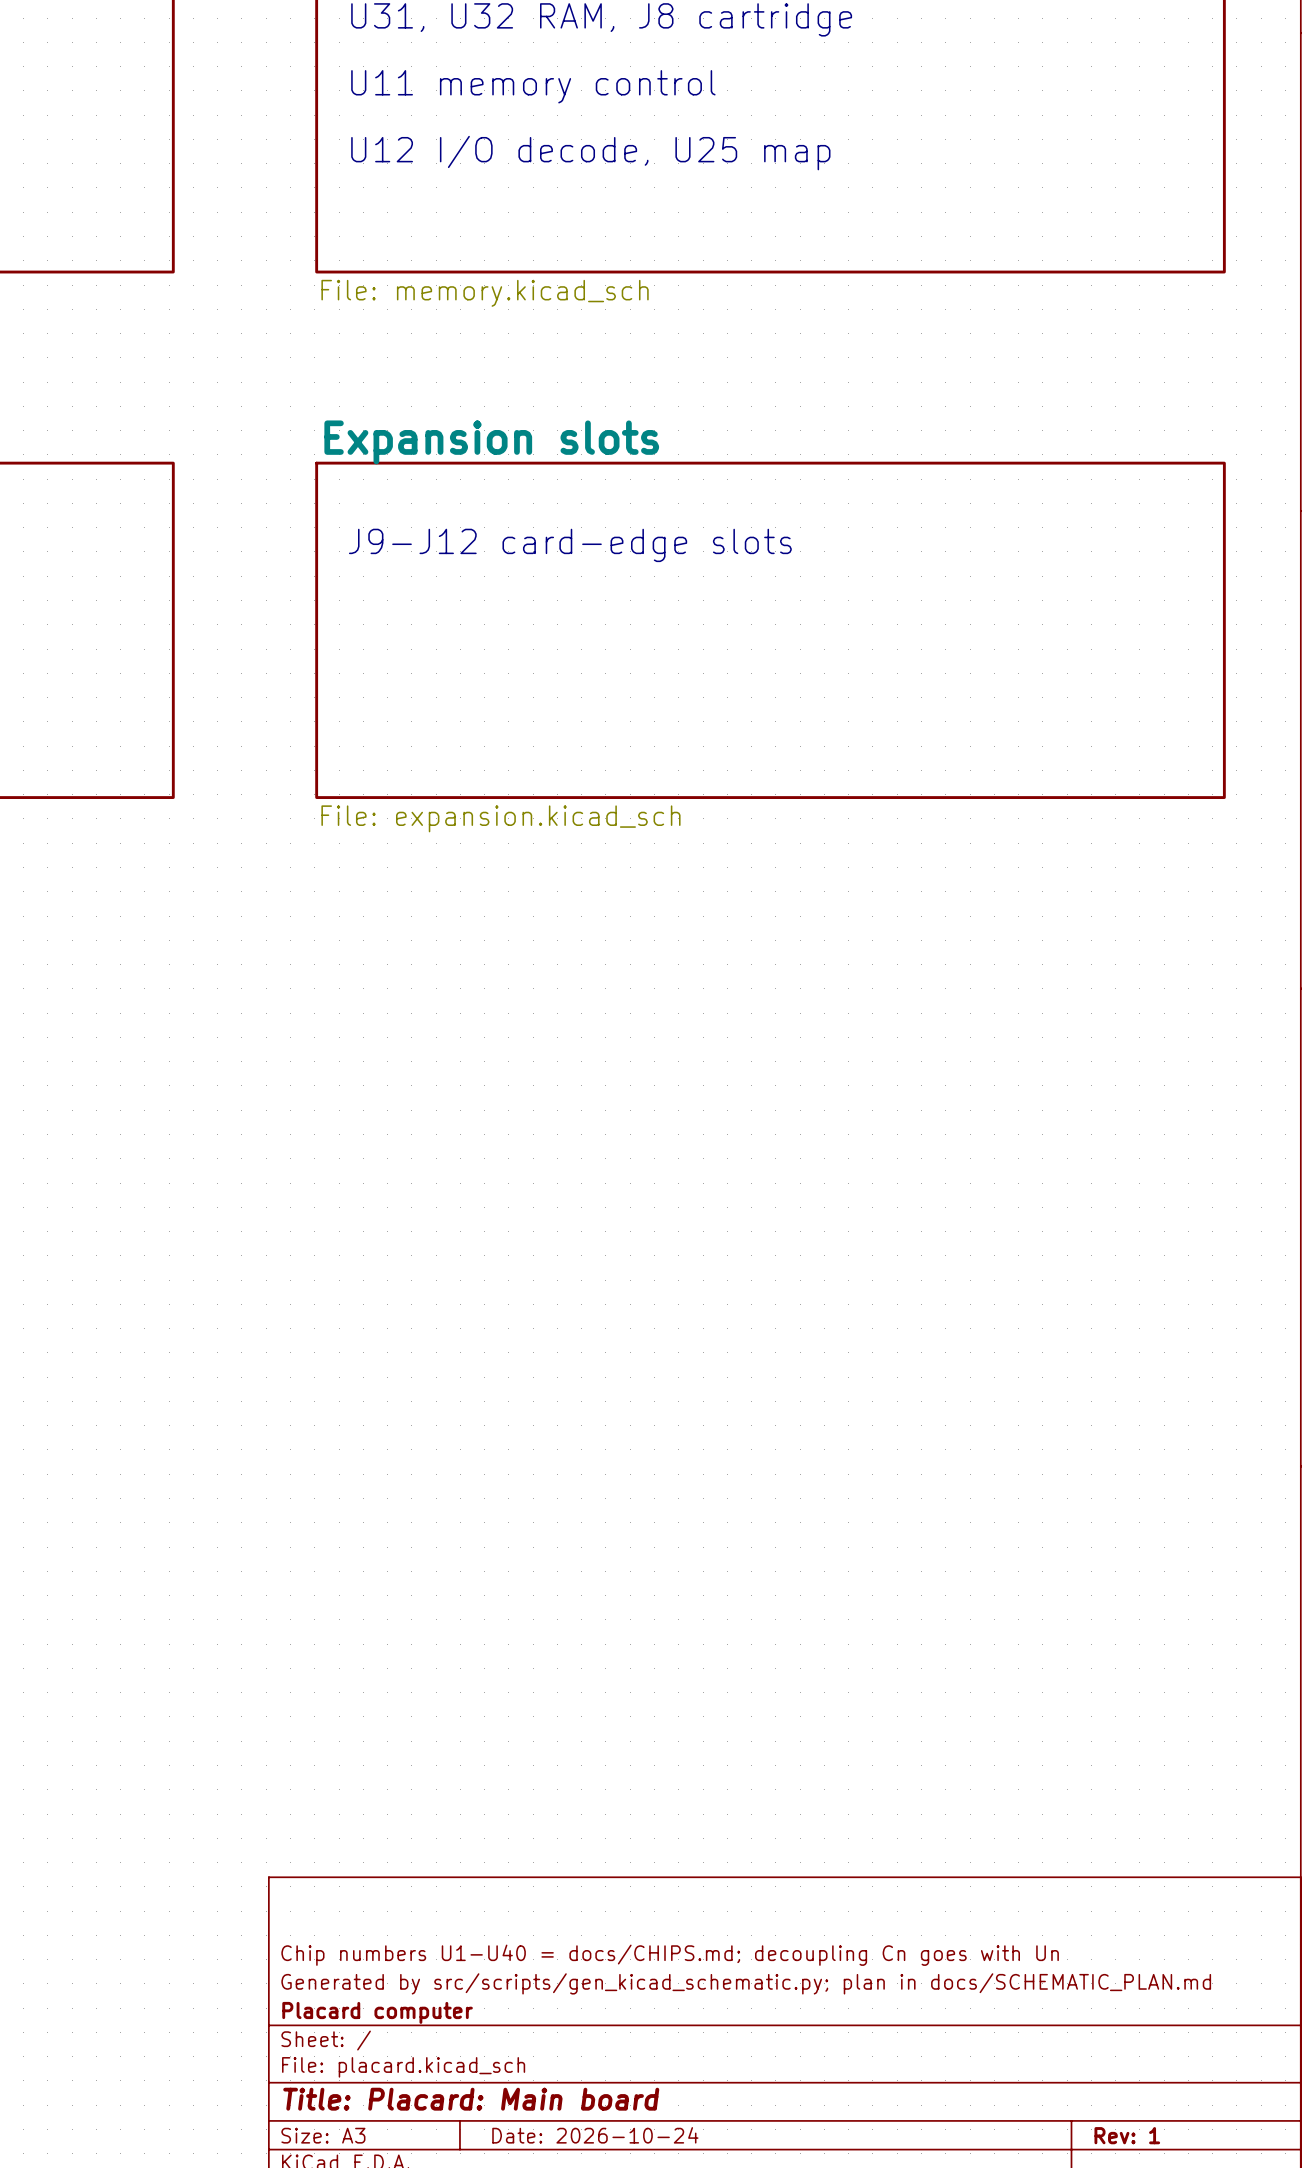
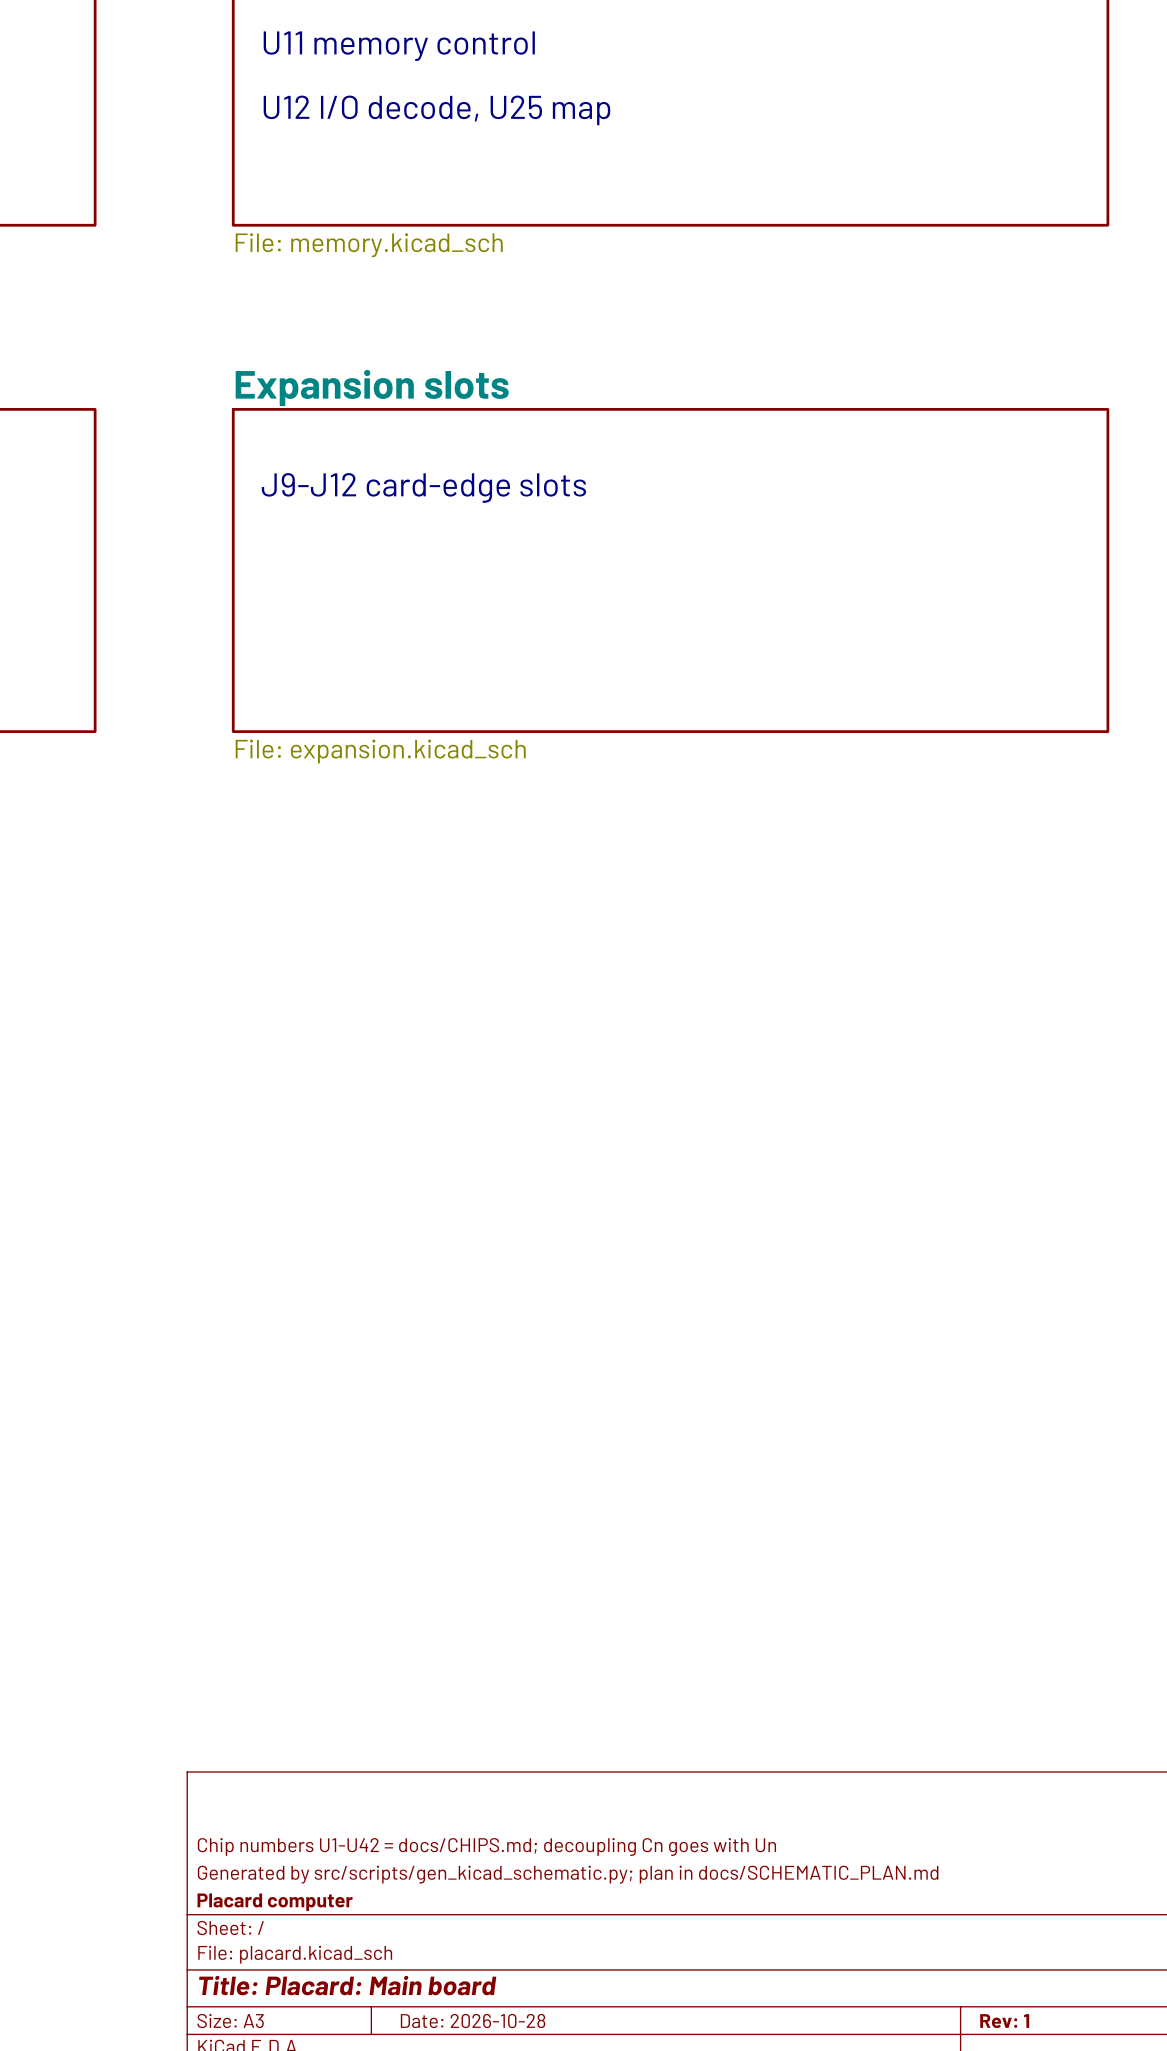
title block: Chip numbers U1-U40 = docs/CHIPS.md; decoupling Cn goes with Un (670, 1955) -> Chip numbers U1-U42 = docs/CHIPS.md; decoupling Cn goes with Un (486, 1847)
title block: Date: 2026-10-24 (595, 2135) -> Date: 2026-10-28 (473, 2021)

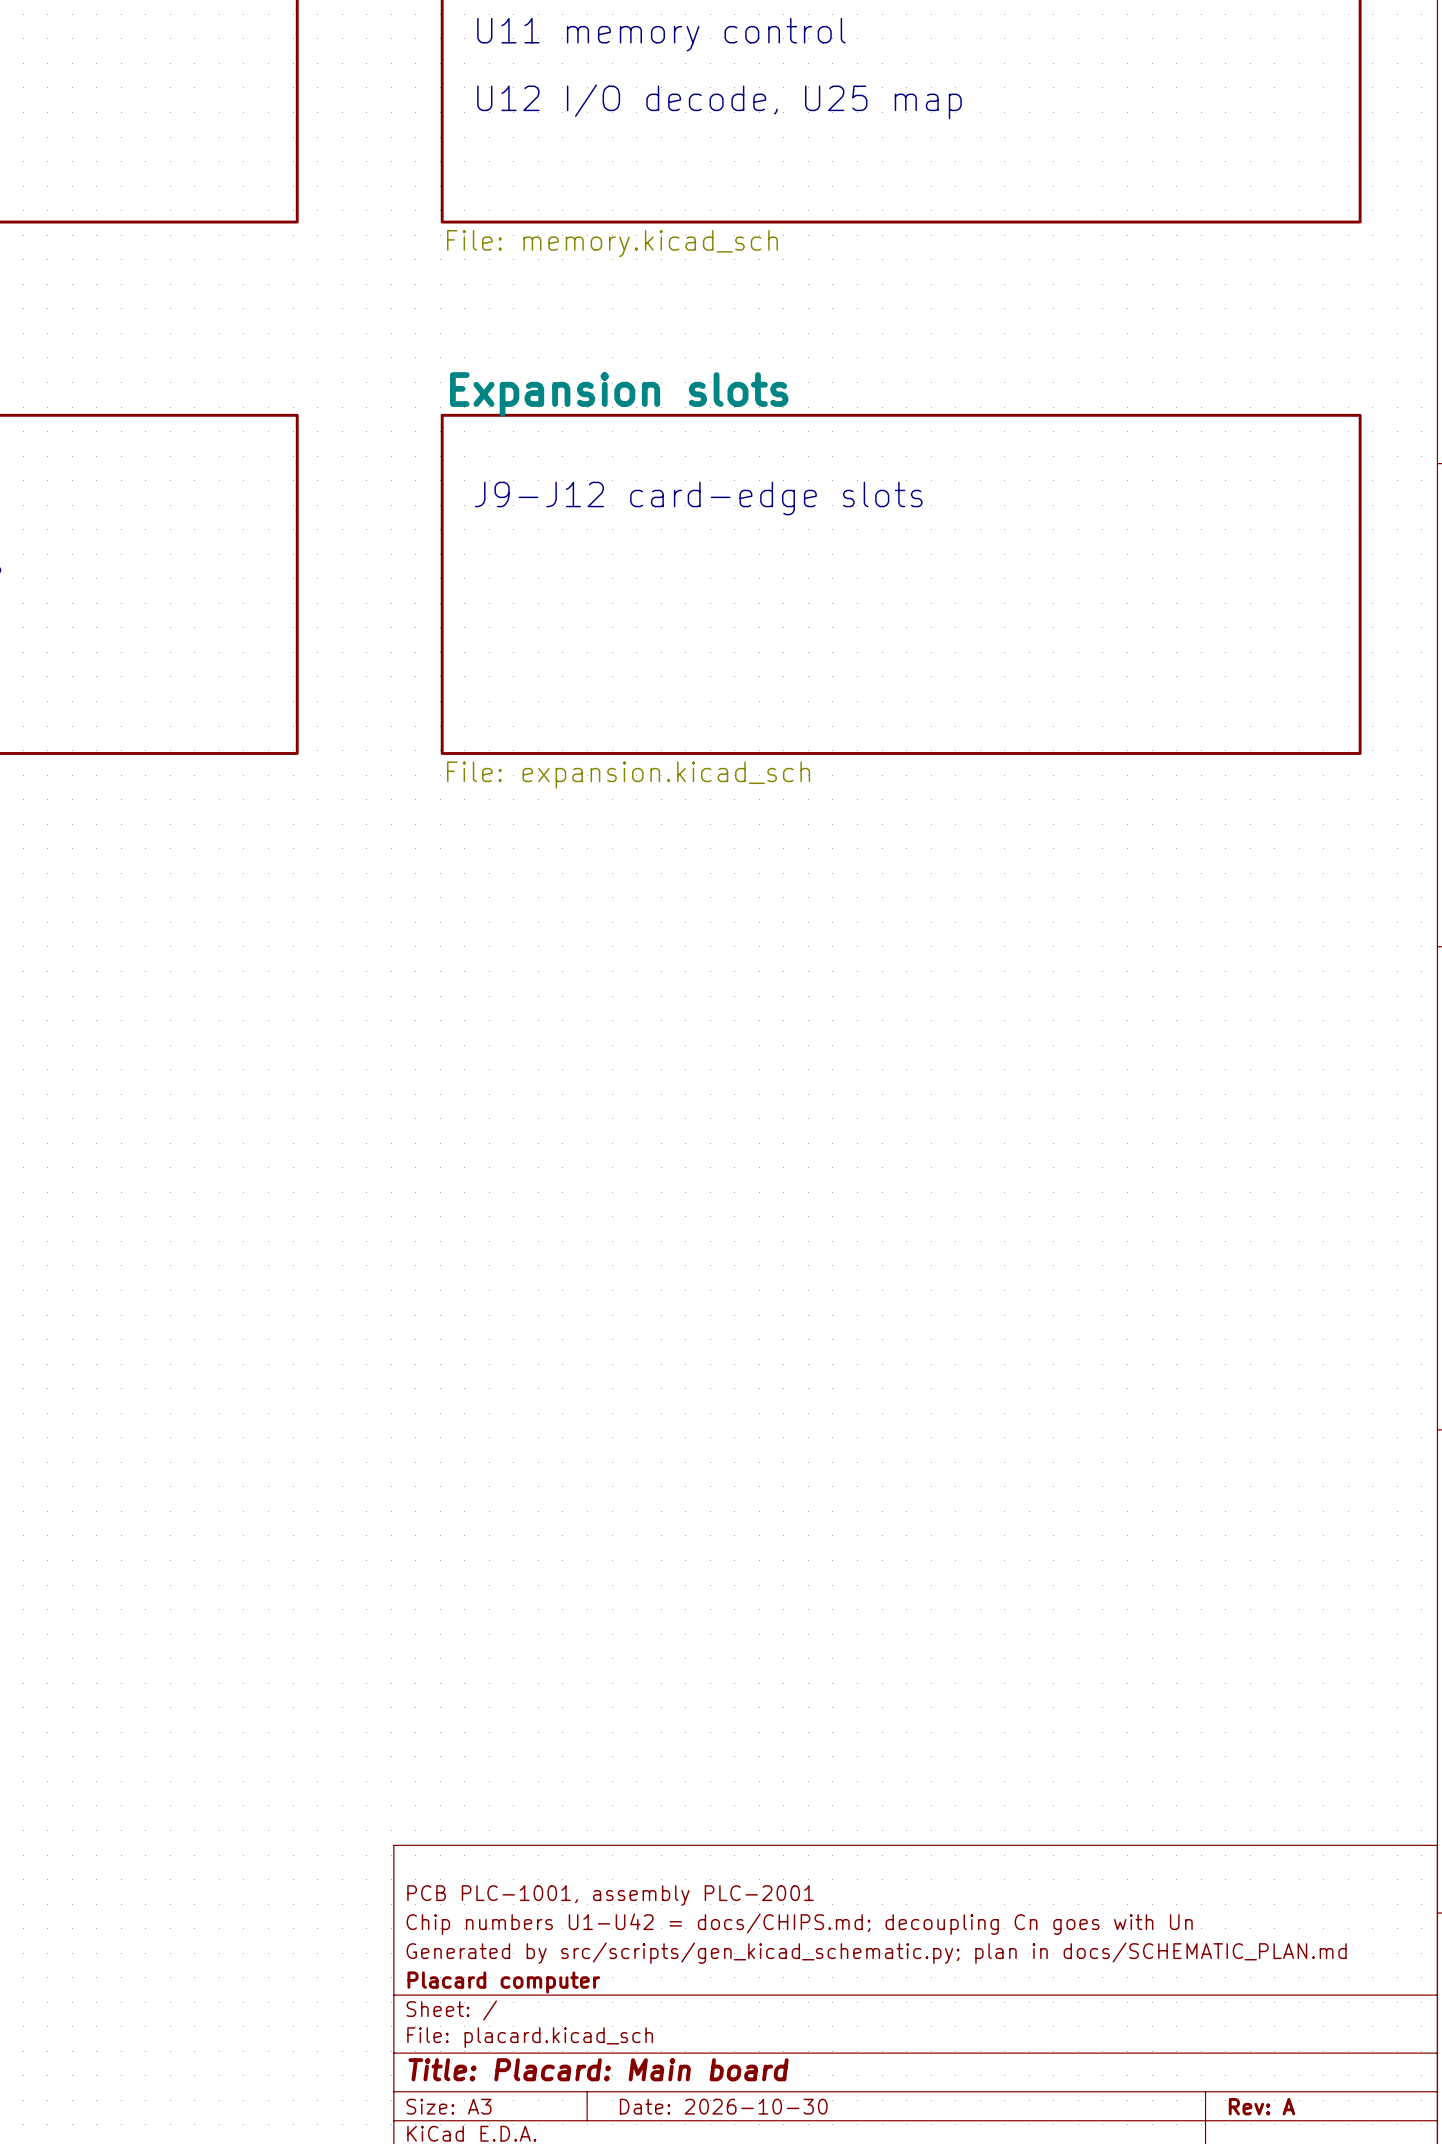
title block: none -> PCB PLC-1001, assembly PLC-2001 (610, 1895)
title block: Date: 2026-10-28 (473, 2021) -> Date: 2026-10-30 (723, 2106)
title block: Rev: 1 (1004, 2021) -> Rev: A (1261, 2106)

